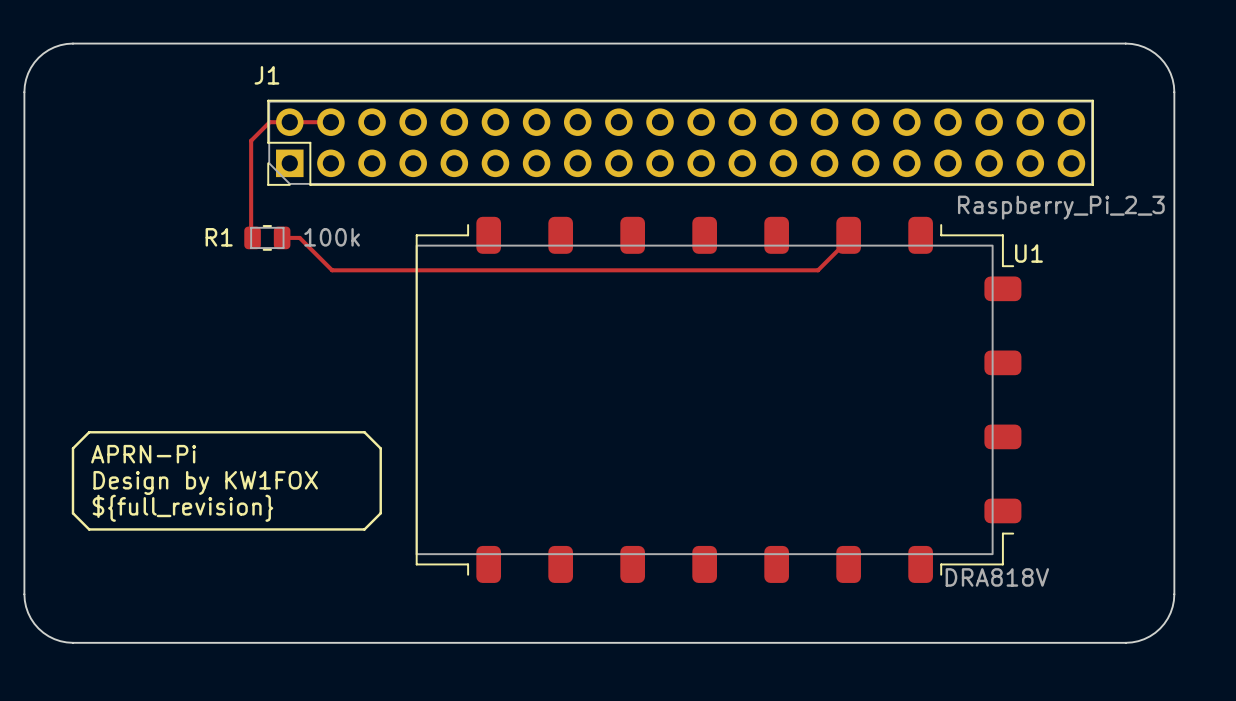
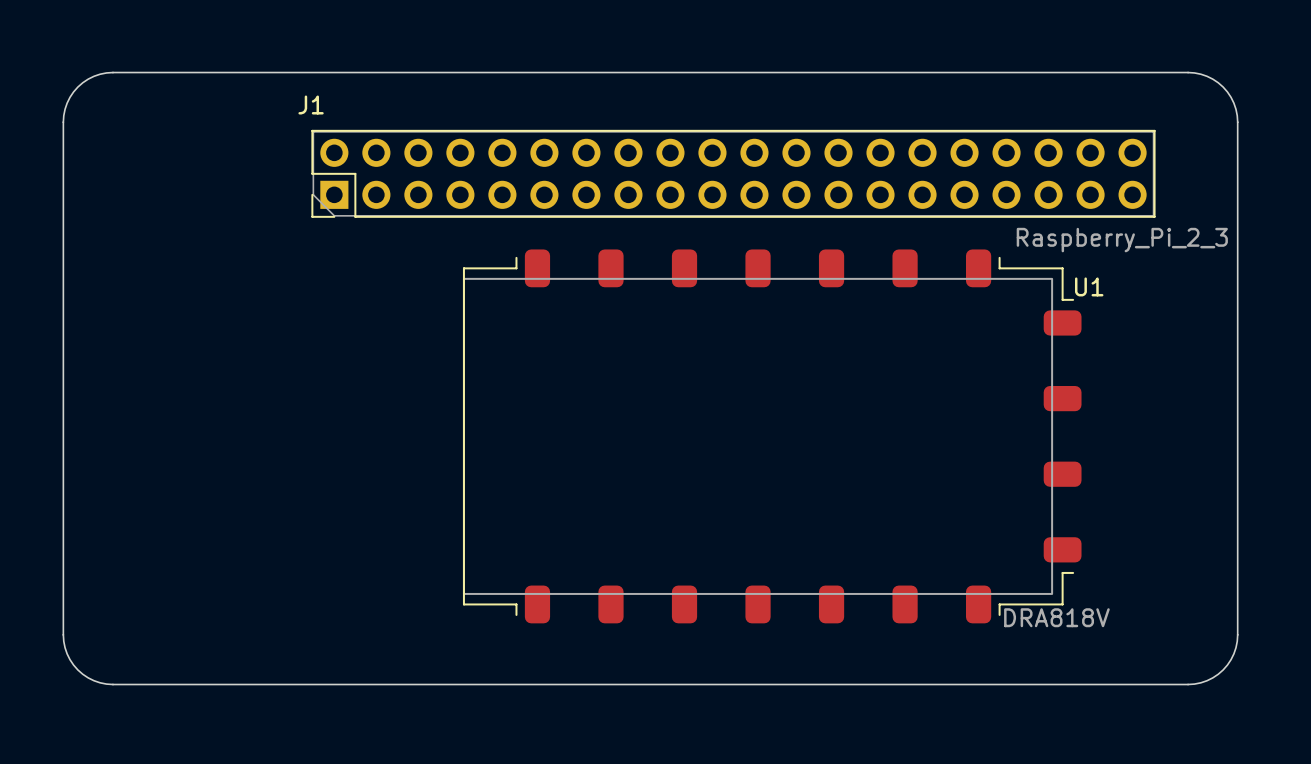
top track: (330, 122) (269, 122) (251, 140) (251, 237) -> none
top track: (848, 235) (848, 239) (818, 270) (332, 270) (299, 237) (282, 237) -> none
R1: 100k (267, 237) -> none
line: (89, 432) (364, 432) (380, 448) (380, 513) (364, 529) (89, 529) (72, 513) (72, 448) (89, 432) -> none
text: APRN-Pi (143, 454) -> none
text: Design by KW1FOX (205, 482) -> none
text: ${full_revision} (182, 508) -> none

